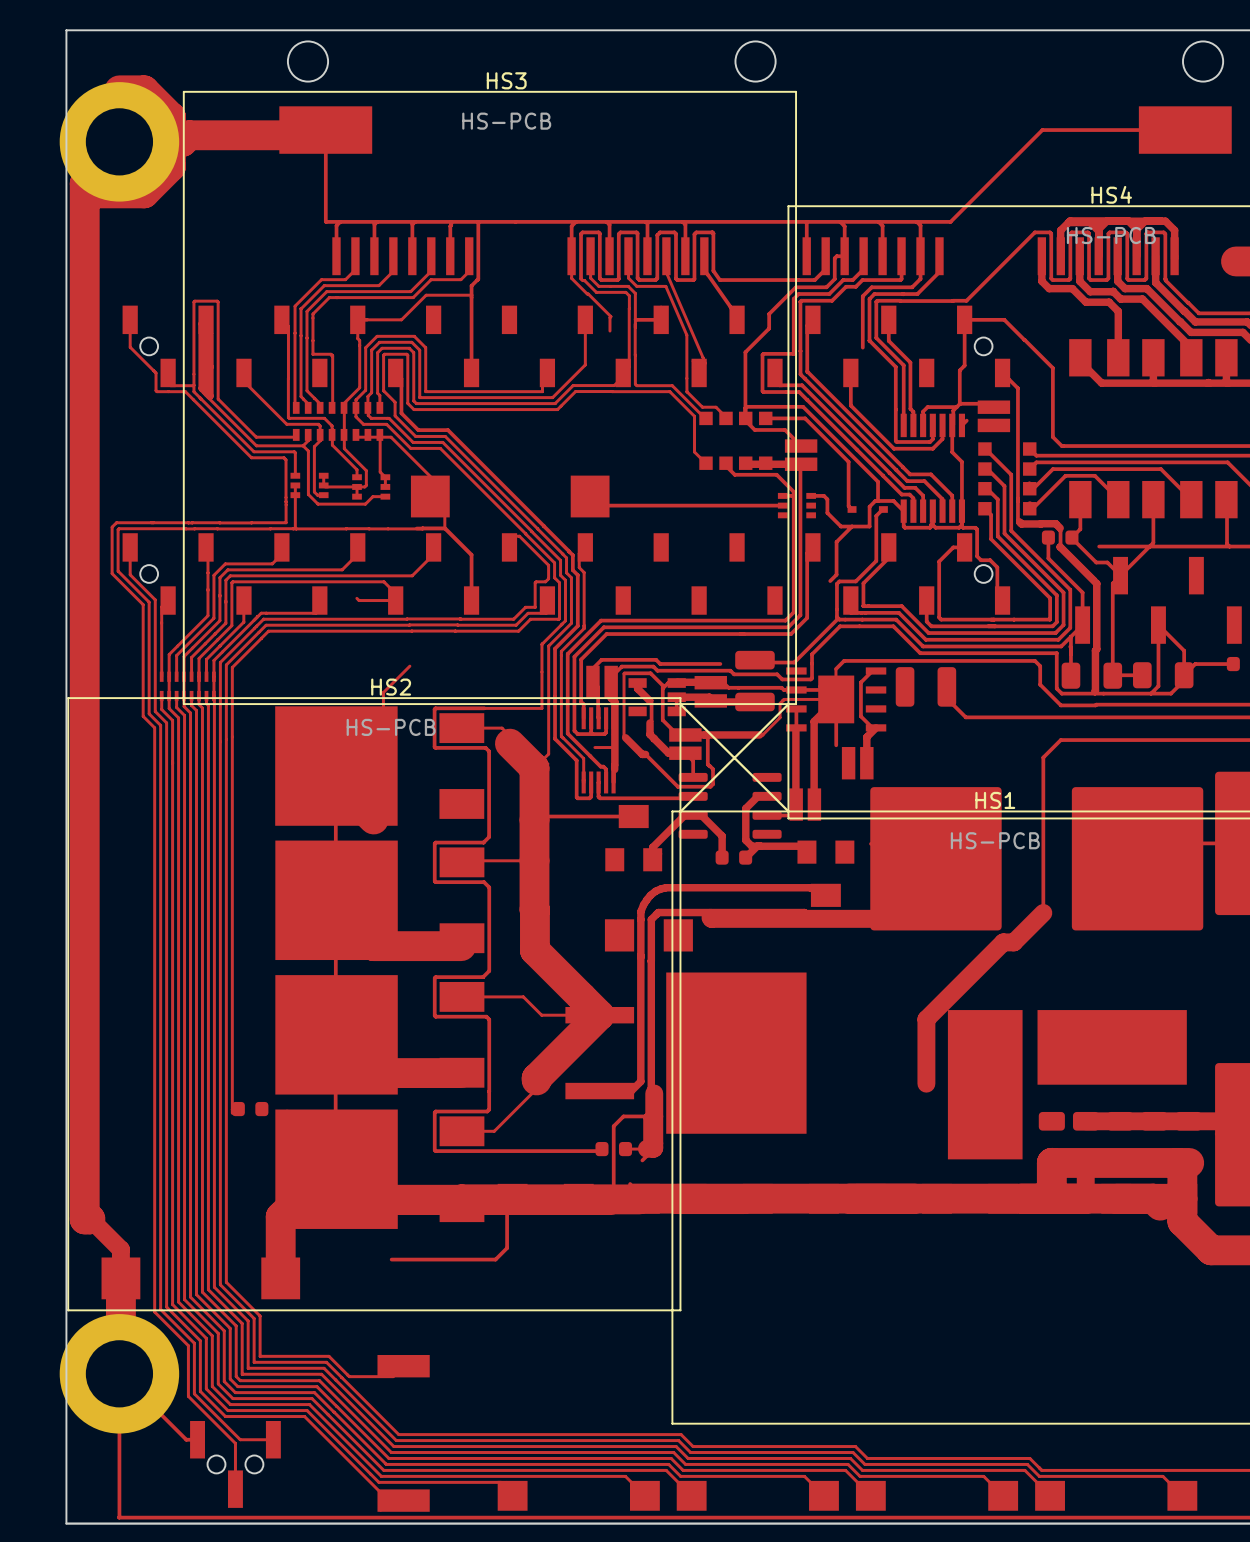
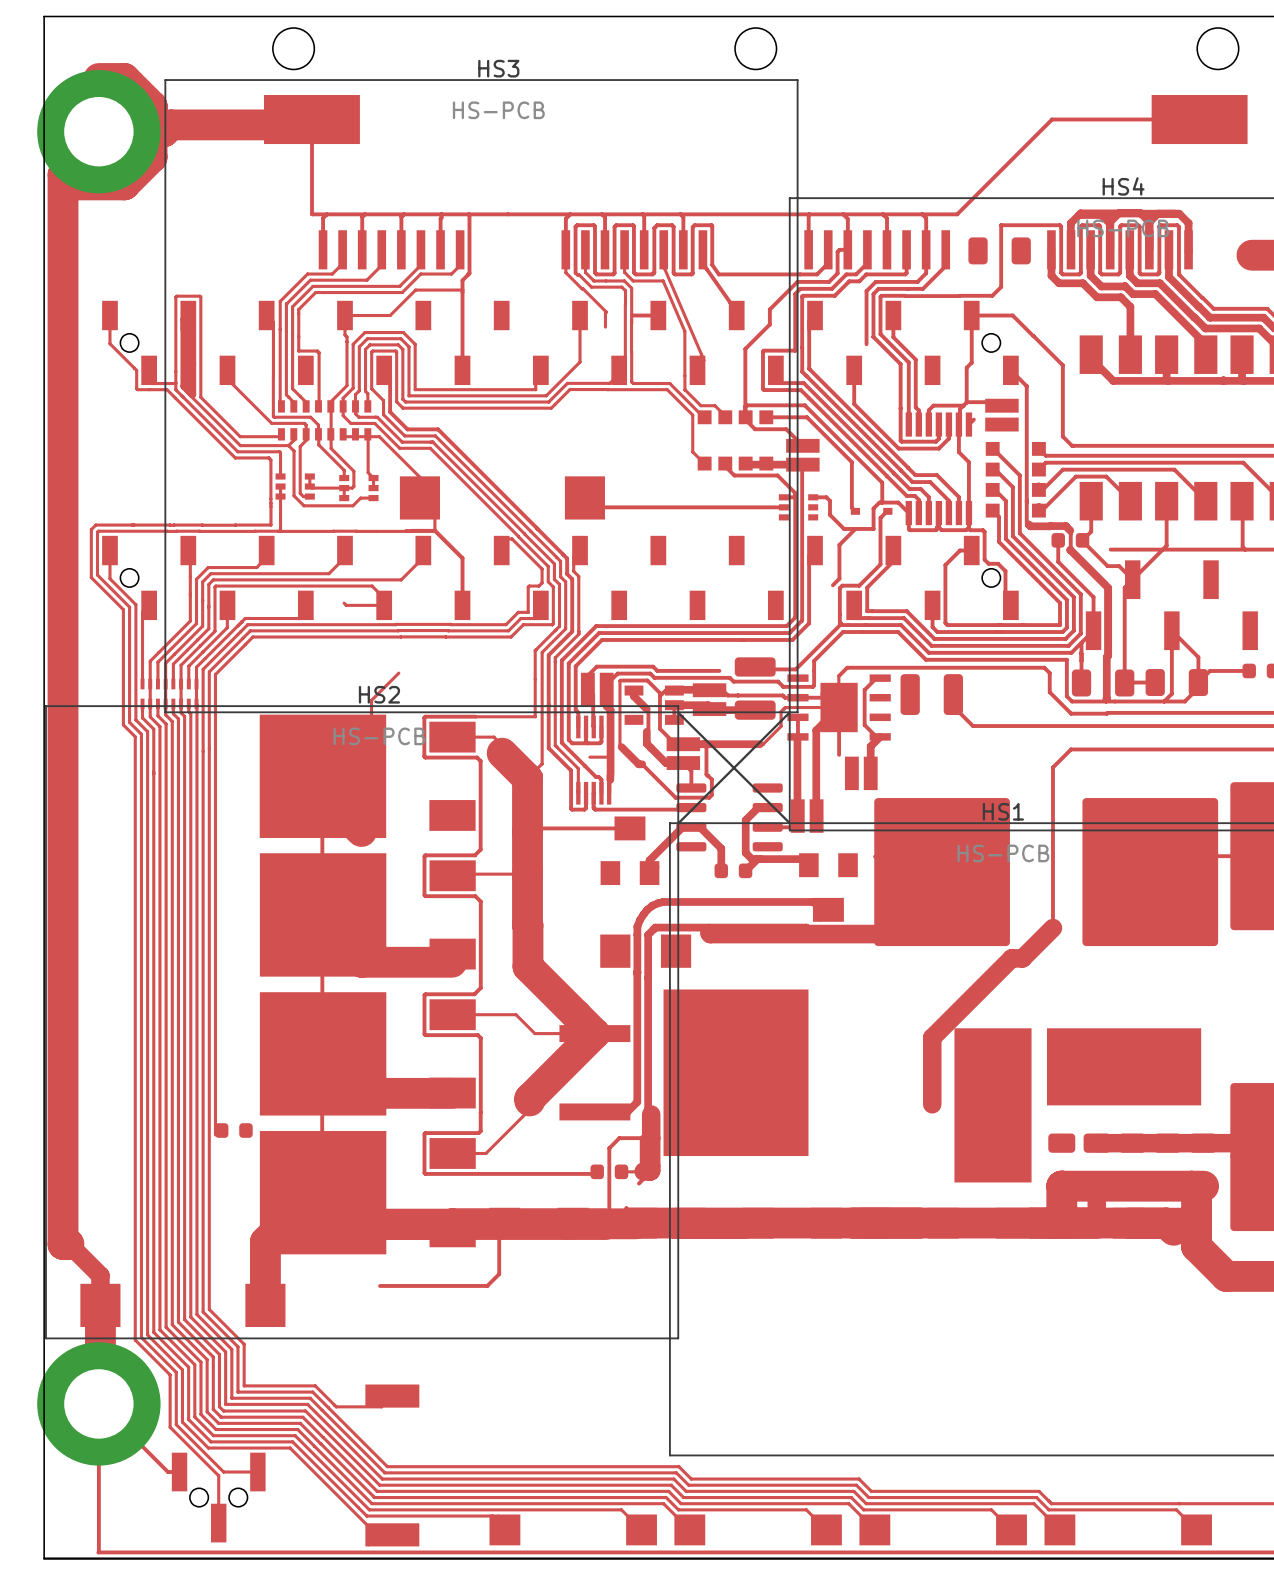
top track: (1034, 232) (966, 300) -> (1001, 225) (1001, 286) (992, 295) (973, 295)
top track: none -> (1044, 225) (1001, 225)
part: none -> (999, 250)

